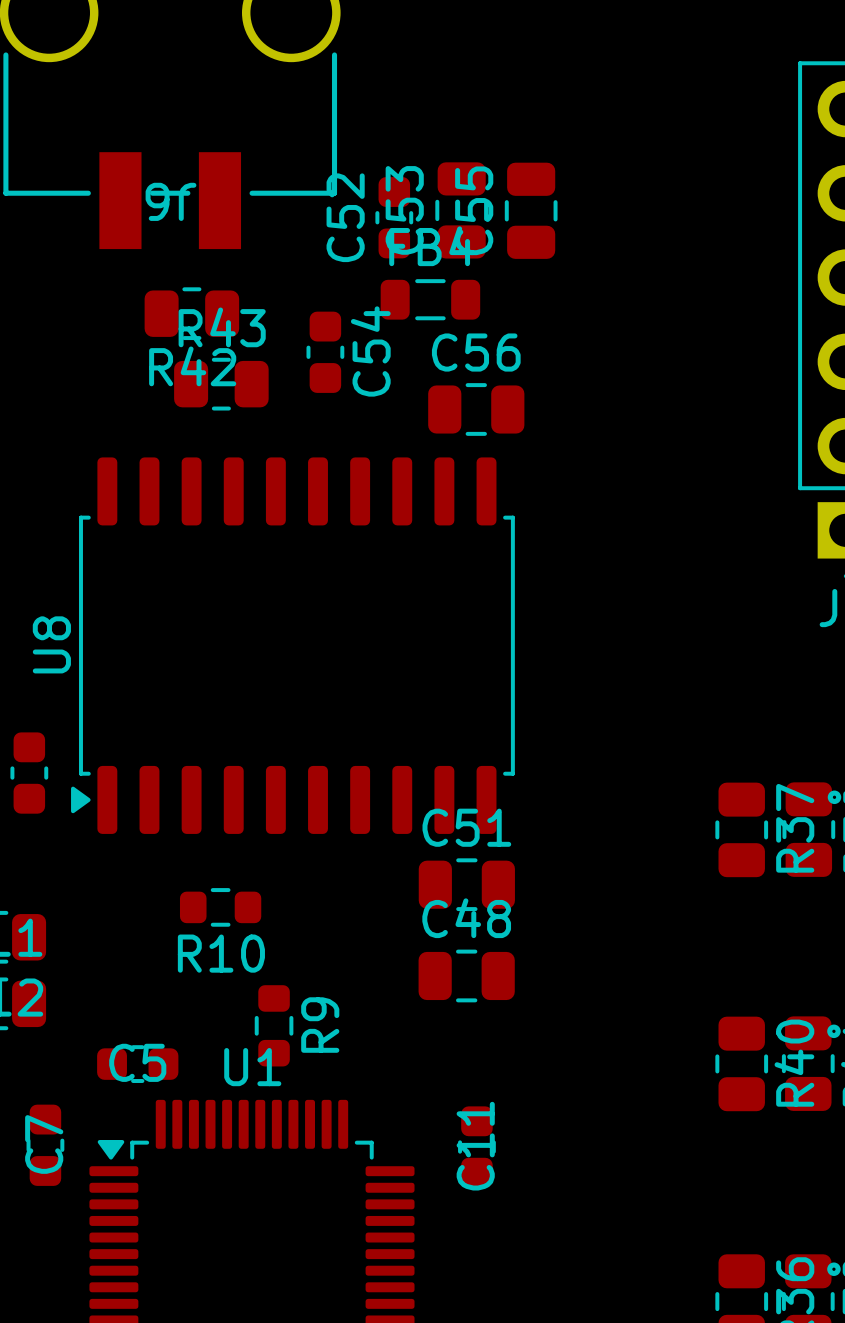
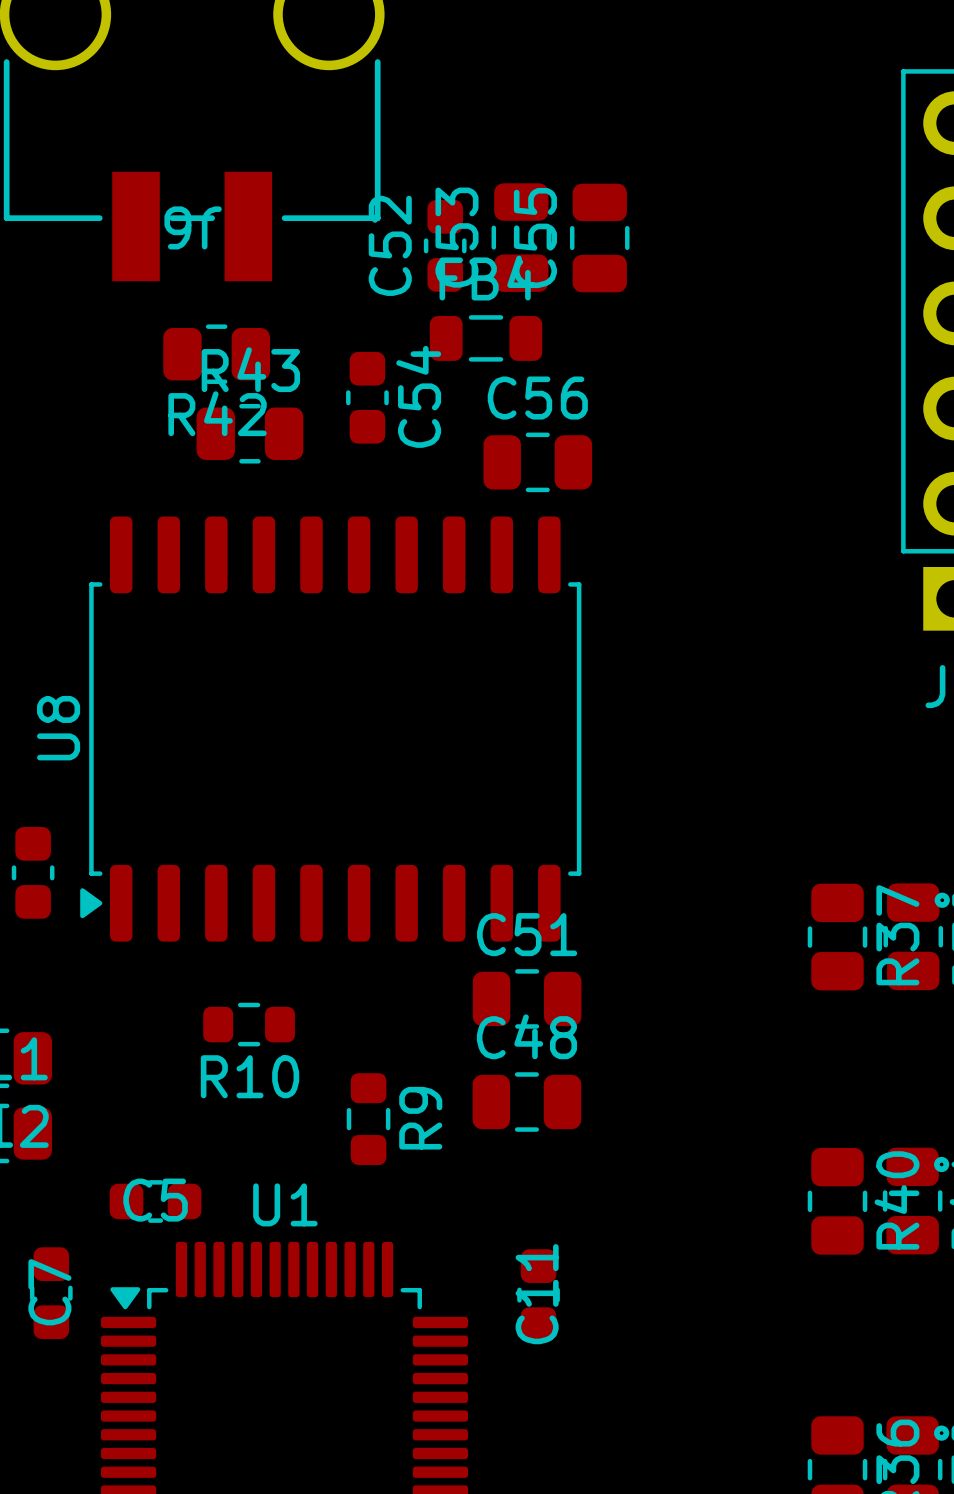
R9 position: (274, 1025) -> (368, 1119)

